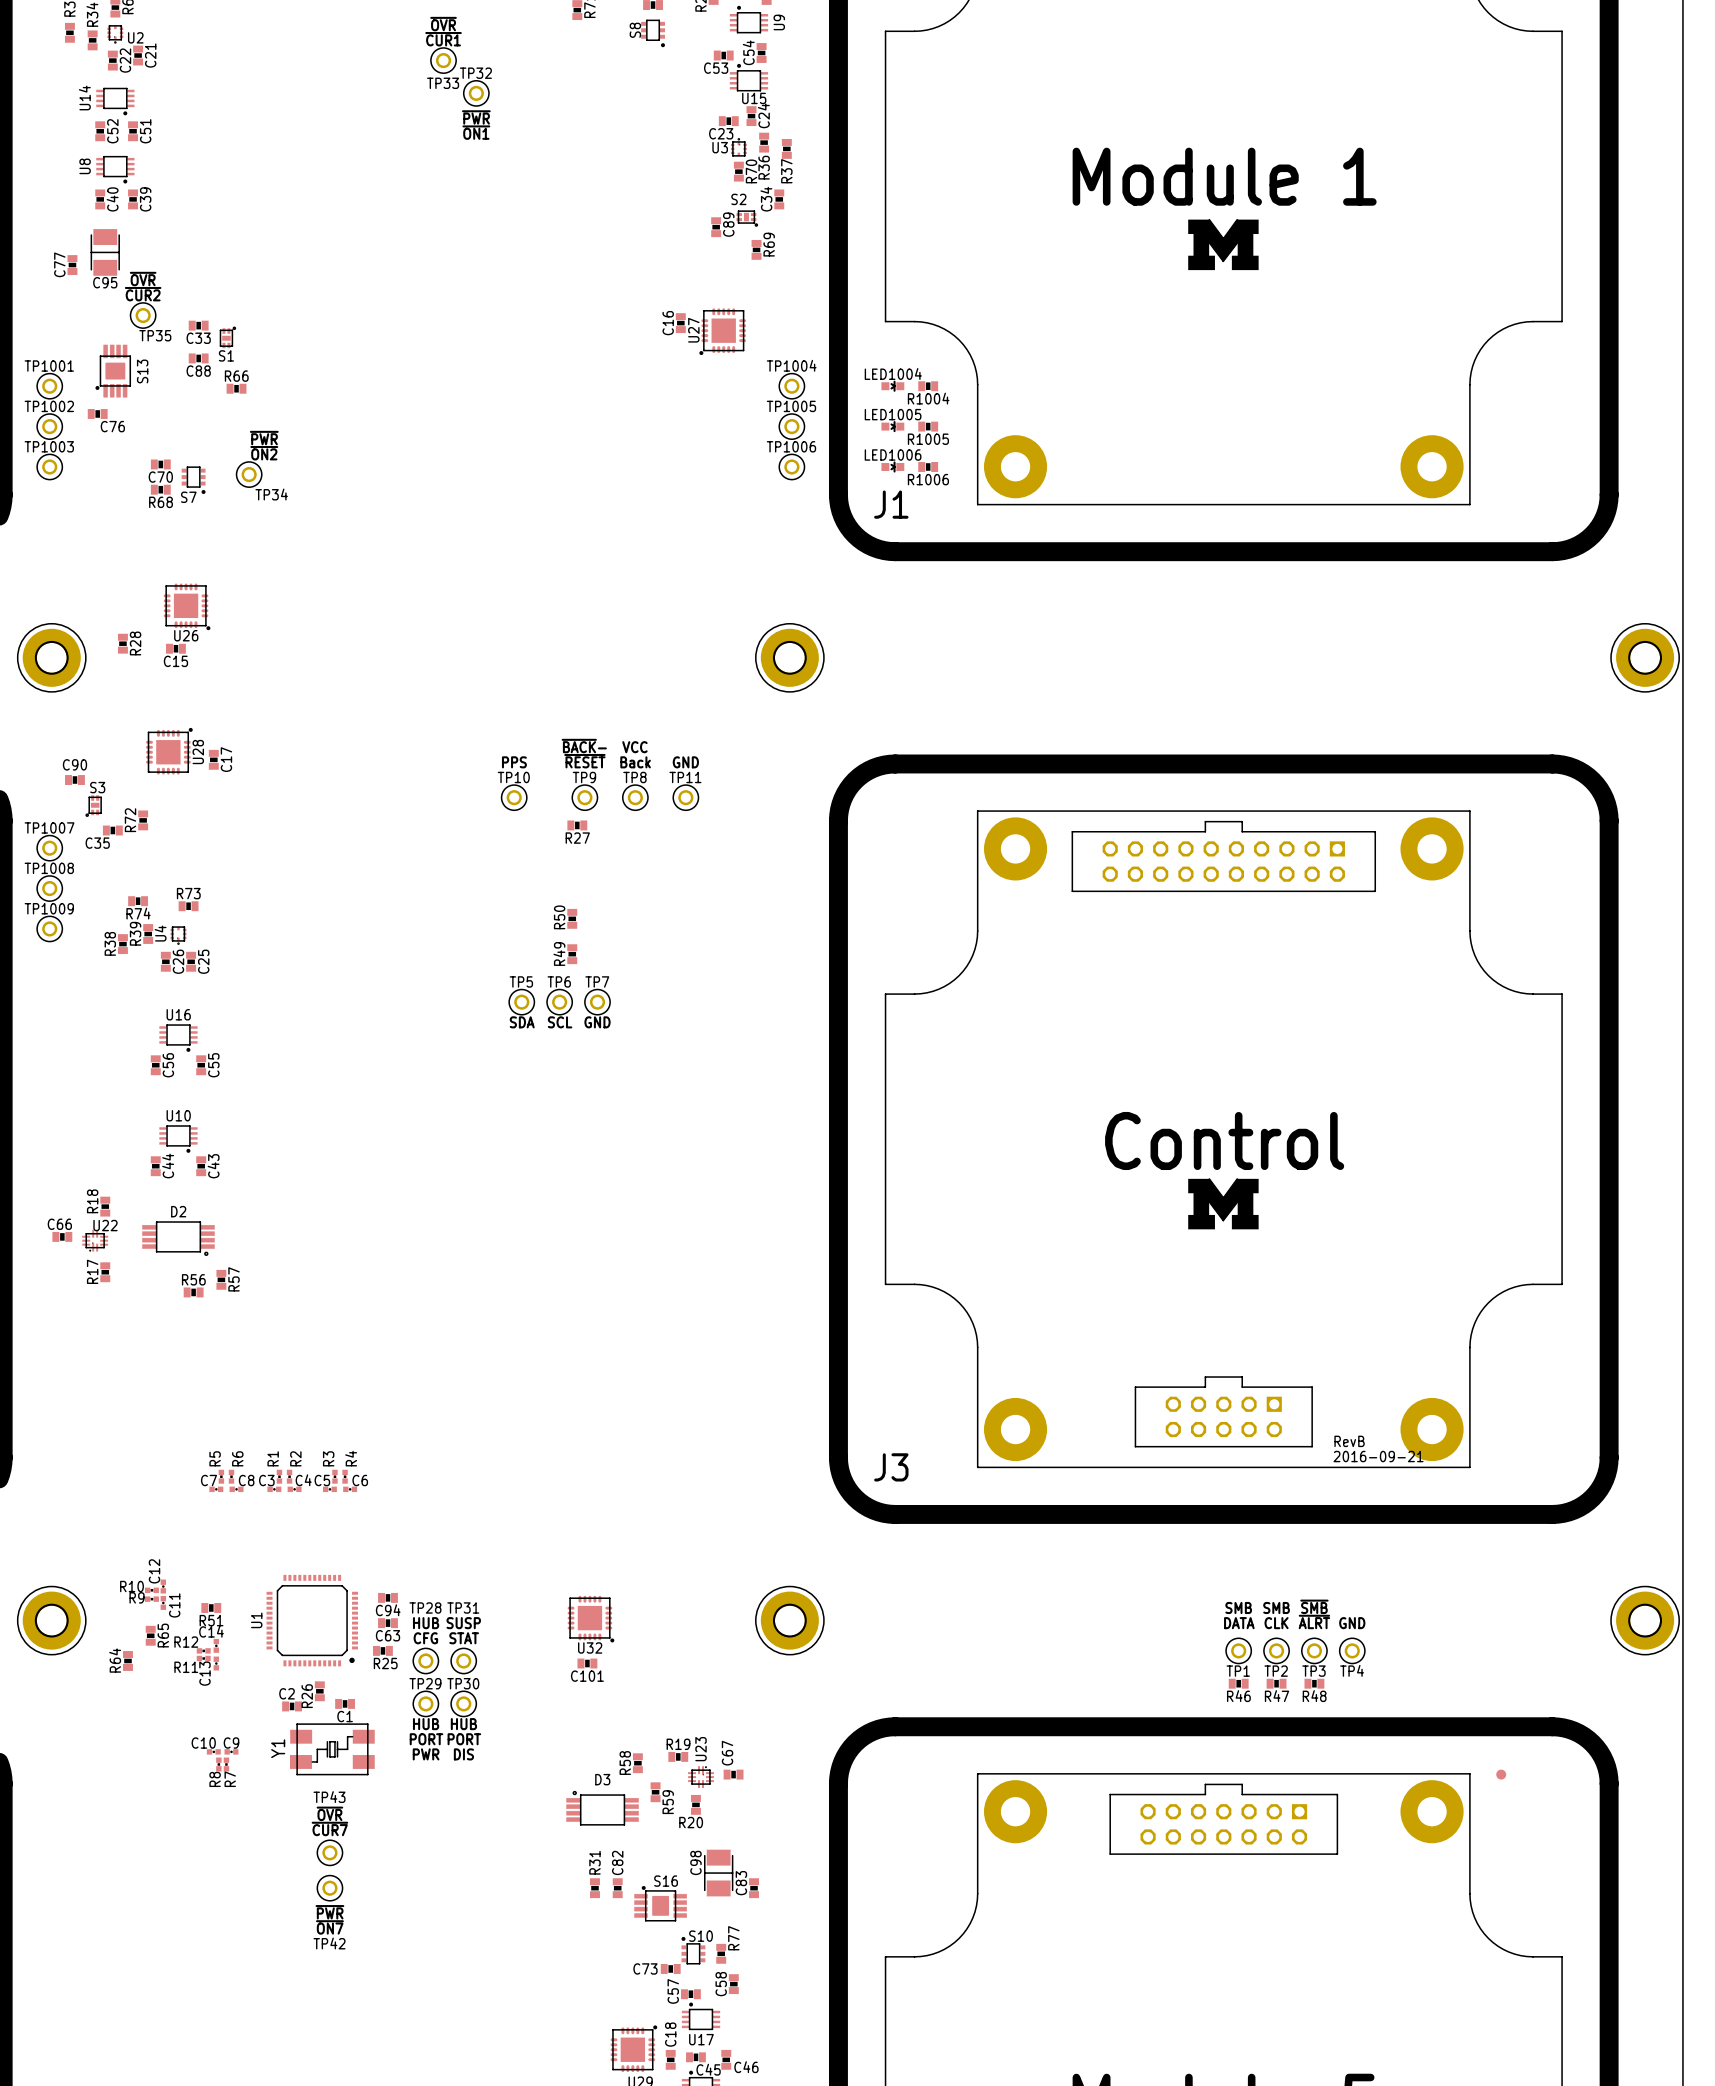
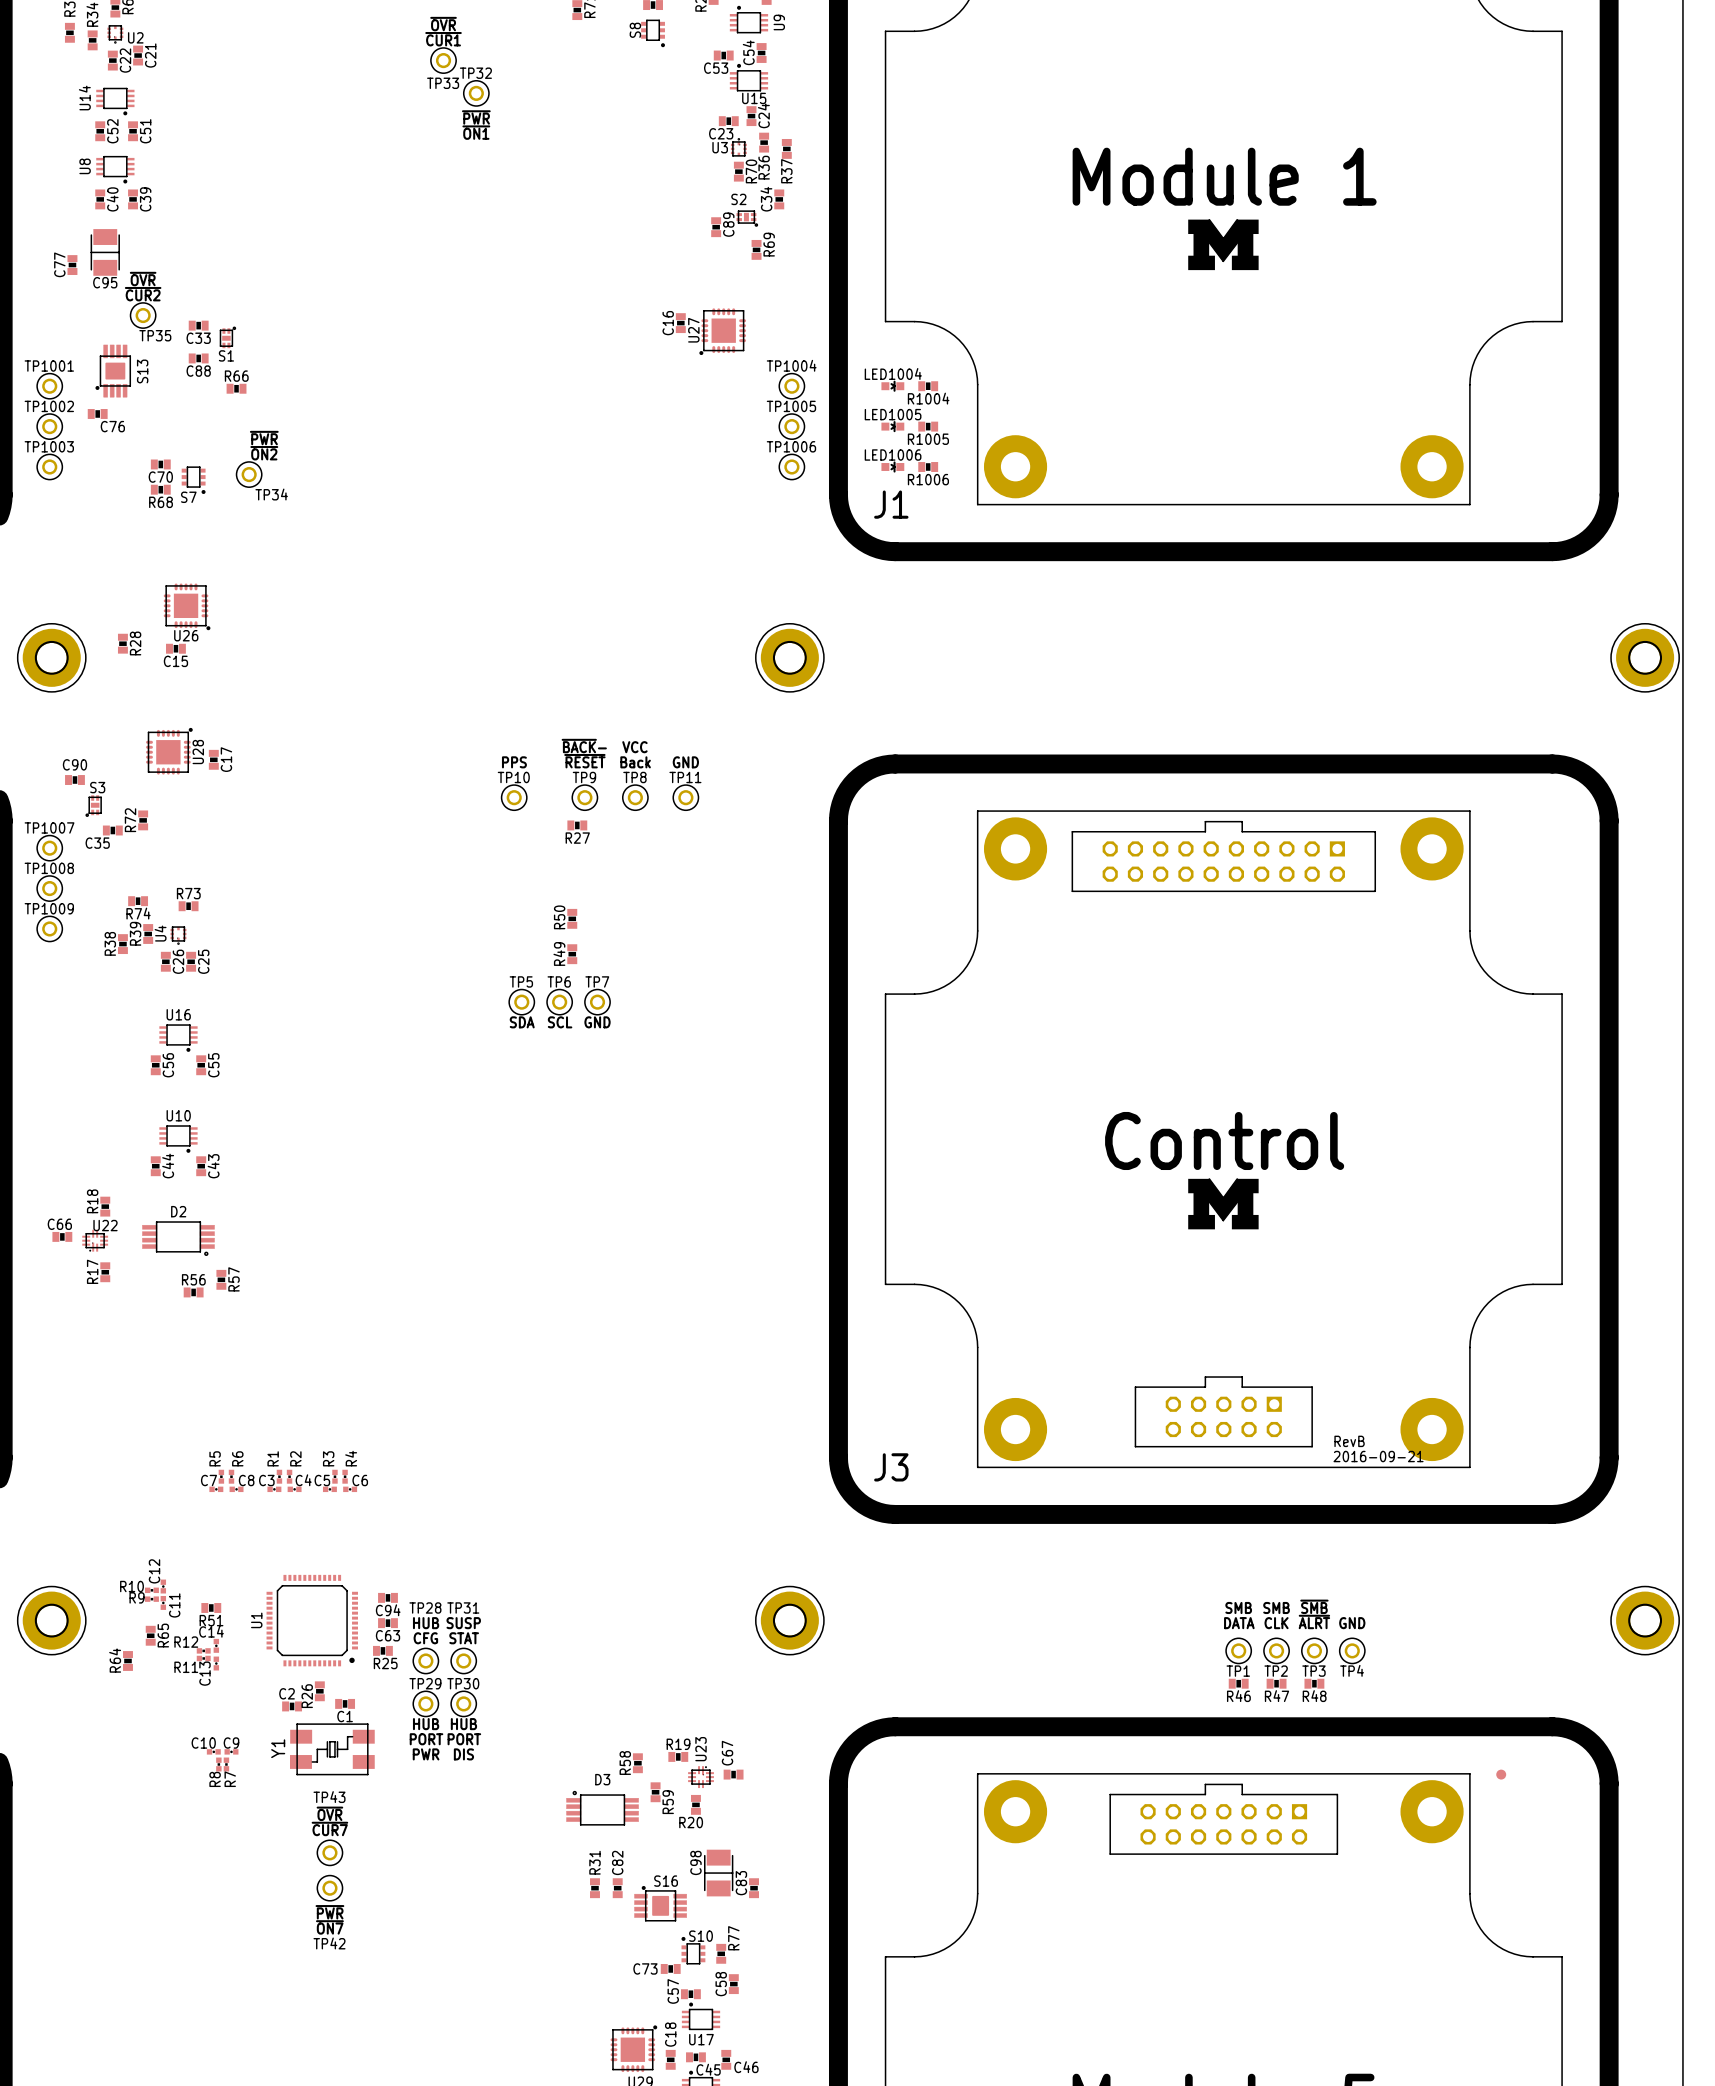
U32: (590, 1619) -> none
C101: (587, 1663) -> none

